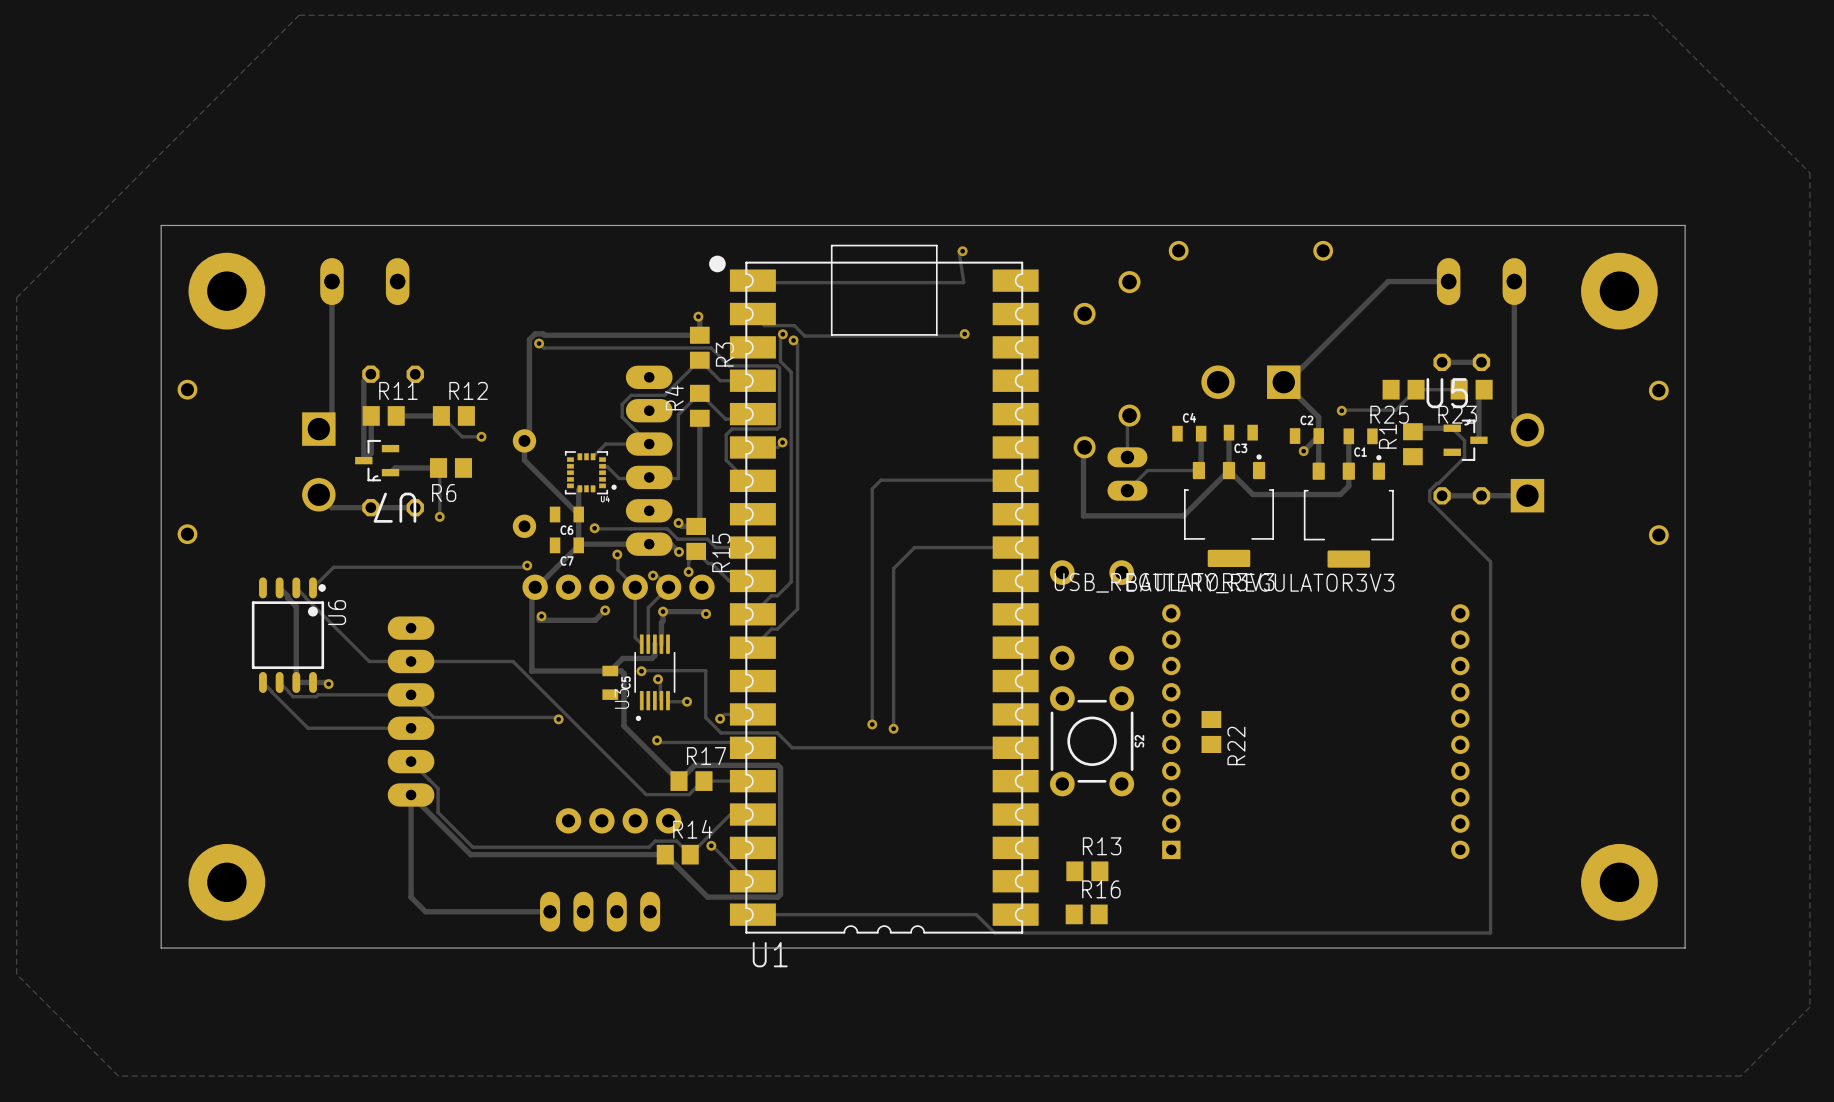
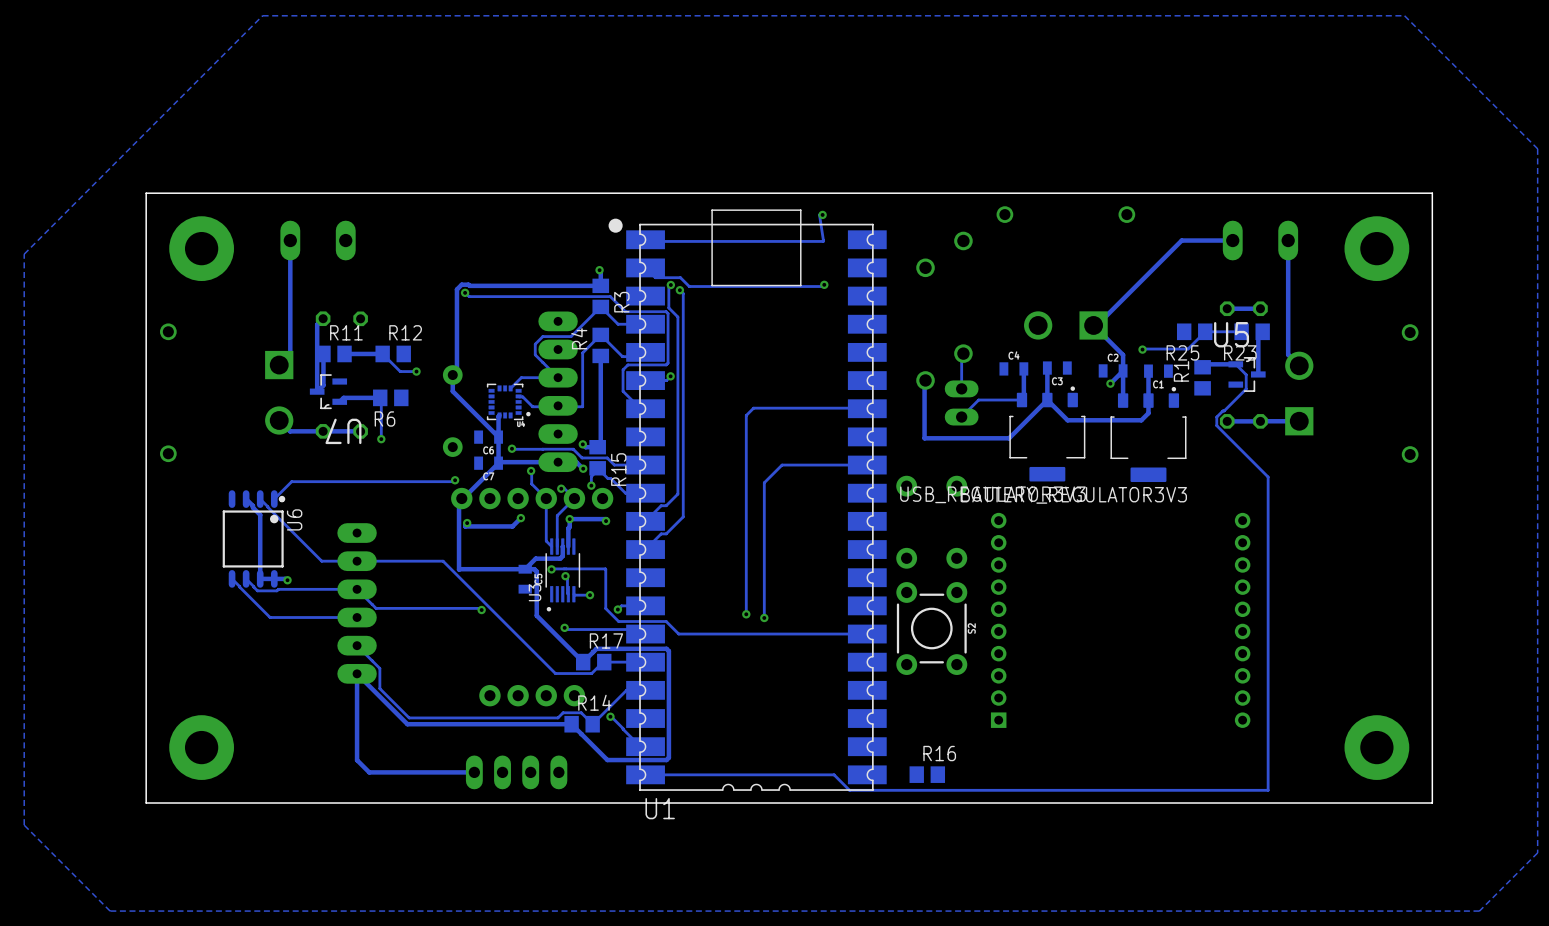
R22: (1211, 731) -> none
R13: (1087, 871) -> none

